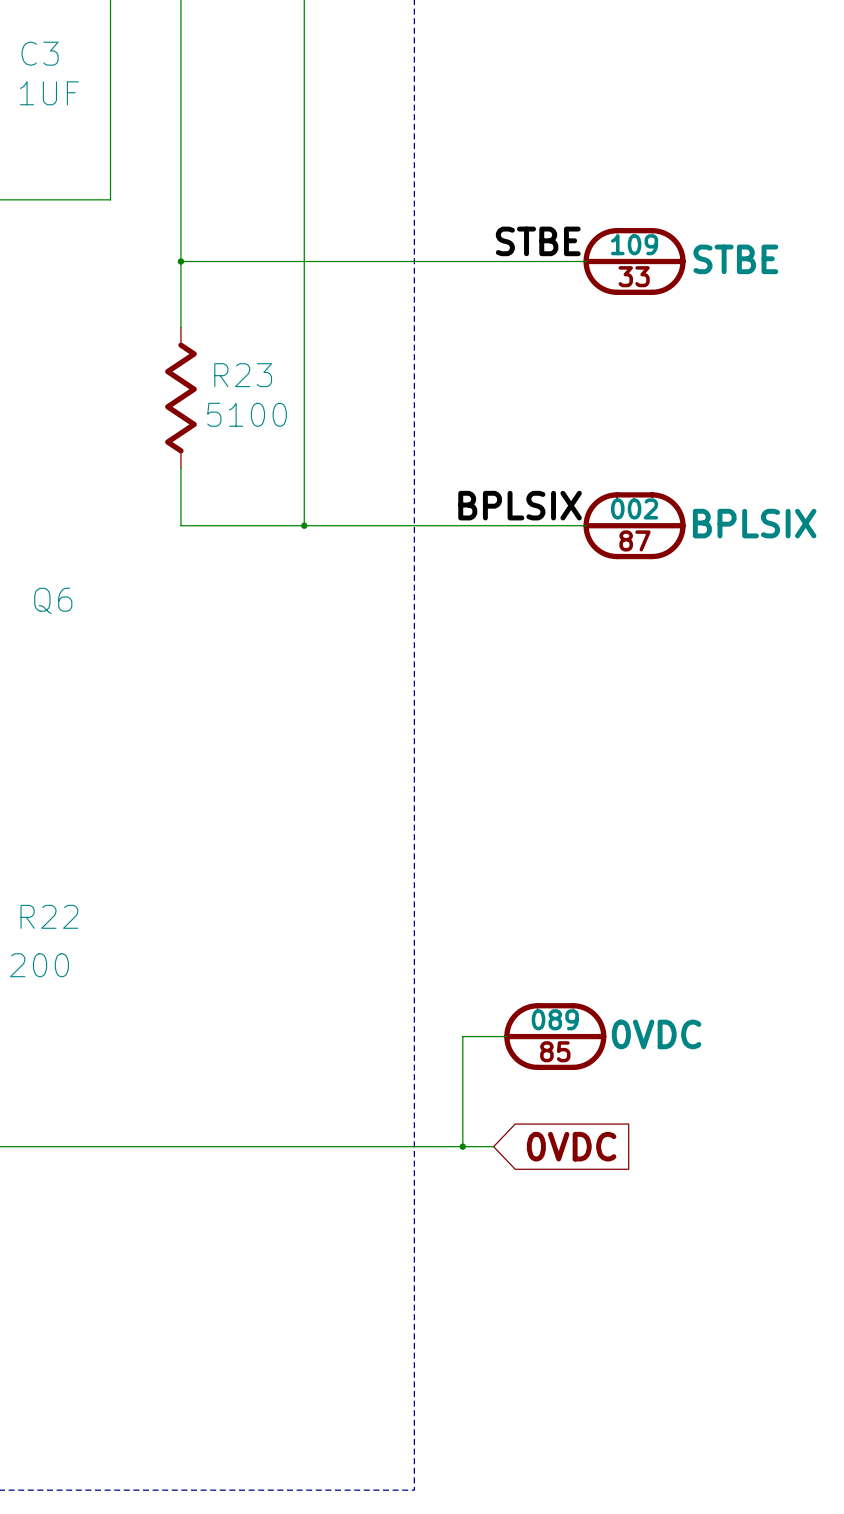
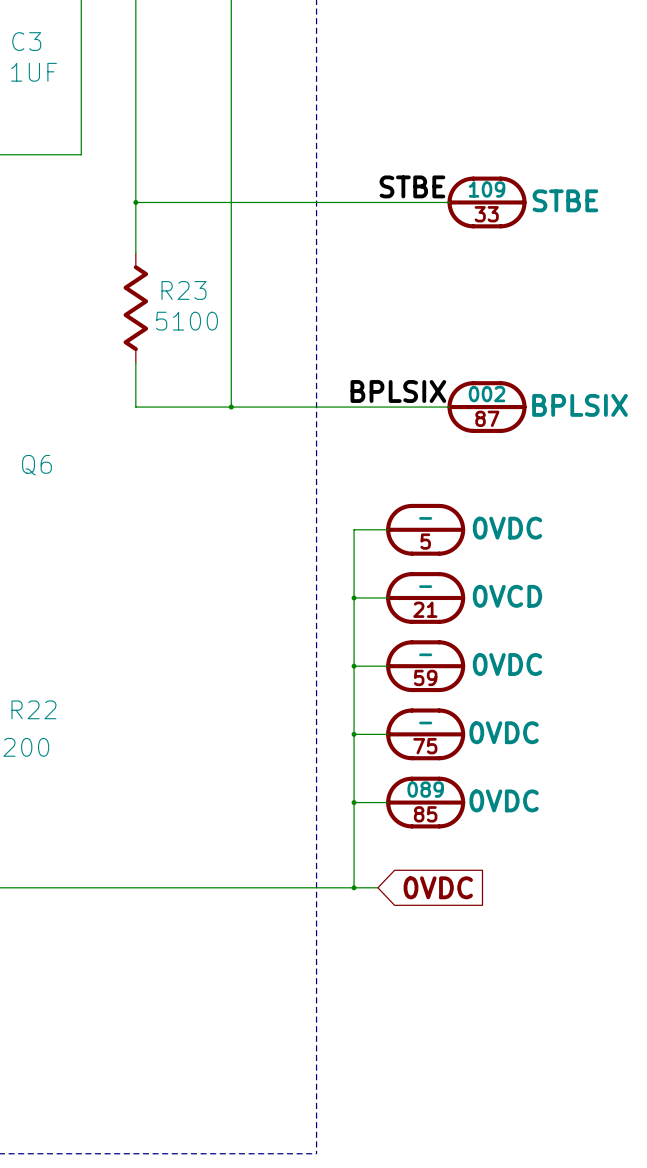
wire: none -> (388, 529) (354, 529) (354, 802)
part: none -> (425, 529)
wire: none -> (354, 597) (388, 597)
junction: none -> (354, 597)
part: none -> (425, 597)
wire: none -> (354, 666) (388, 666)
junction: none -> (354, 666)
part: none -> (425, 666)
wire: none -> (354, 734) (388, 734)
junction: none -> (354, 734)
part: none -> (425, 734)
junction: none -> (354, 802)

